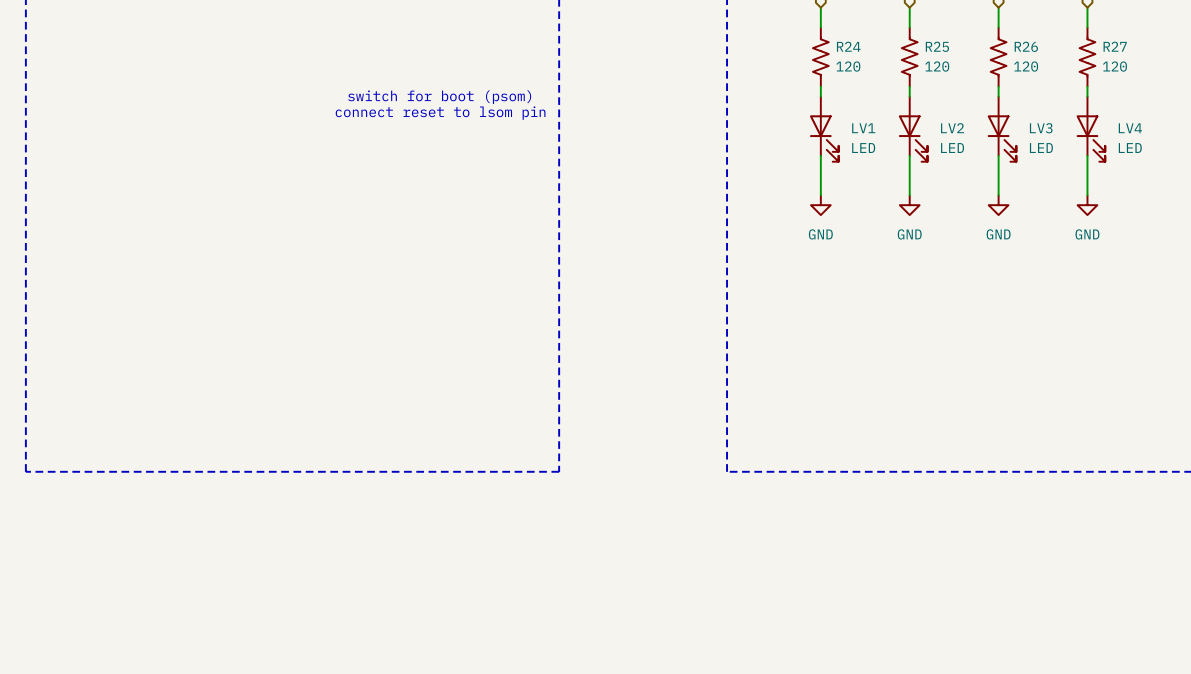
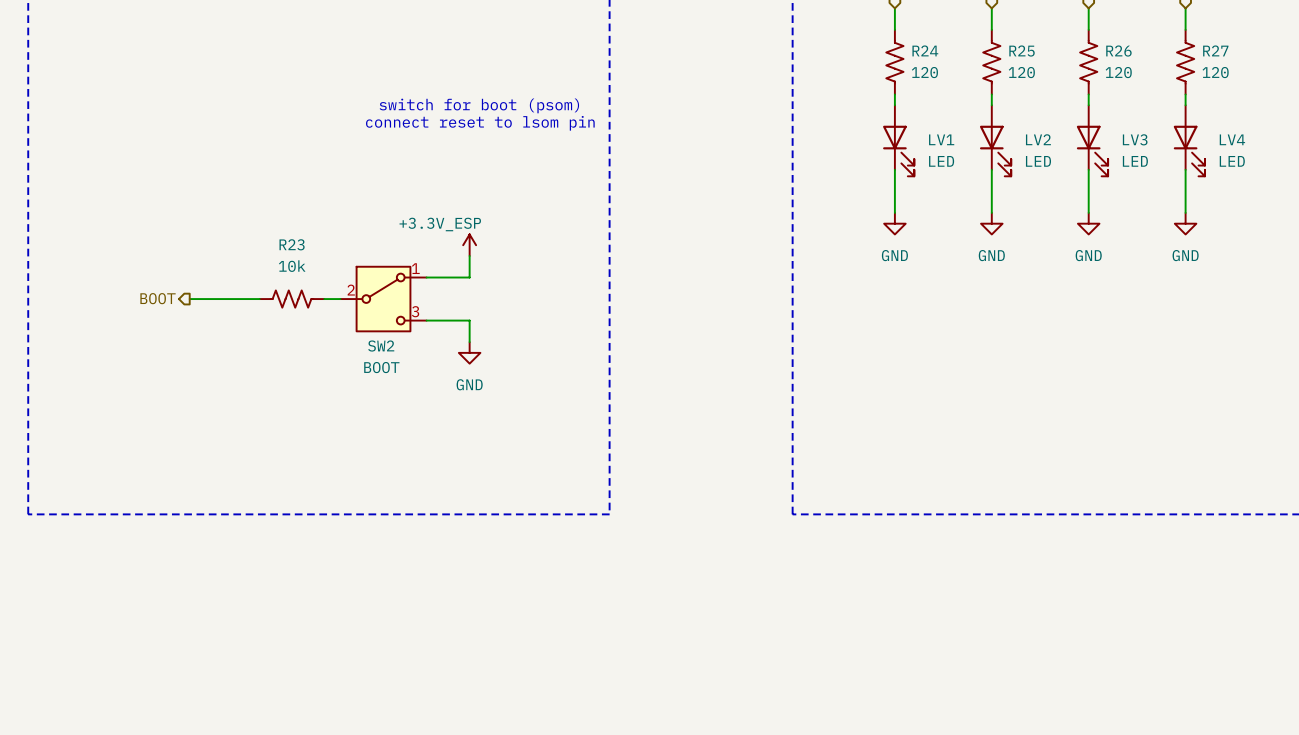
power symbol: none -> +3.3V_ESP (469, 245)
wire: none -> (469, 255) (469, 277) (426, 277)
hierarchical label: none -> BOOT (158, 298)
wire: none -> (189, 299) (259, 299)
R23: none -> 10k (291, 299)
wire: none -> (324, 299) (340, 299)
SW2: none -> BOOT (383, 299)
wire: none -> (426, 320) (469, 320) (469, 342)
power symbol: none -> GND (469, 352)

